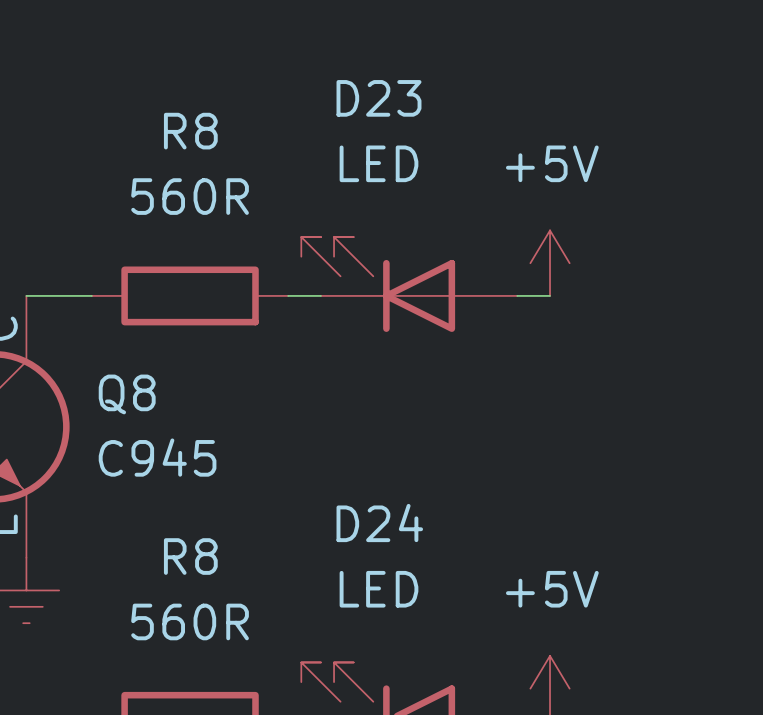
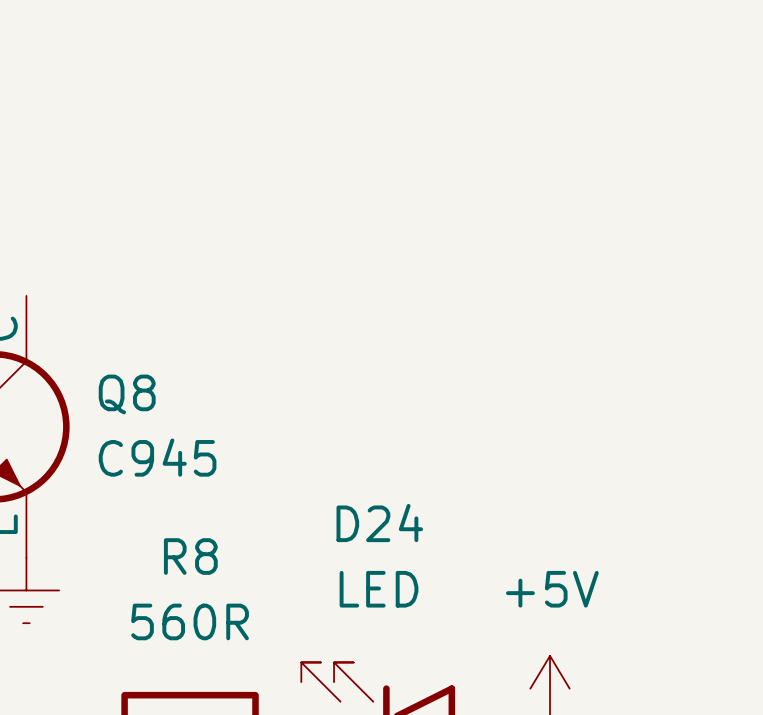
power symbol: +5V (550, 263) -> none
D23: LED (409, 284) -> none
wire: (26, 295) (91, 295) -> none
R8: 560R (190, 295) -> none
wire: (288, 295) (320, 295) -> none
wire: (517, 295) (550, 295) -> none

